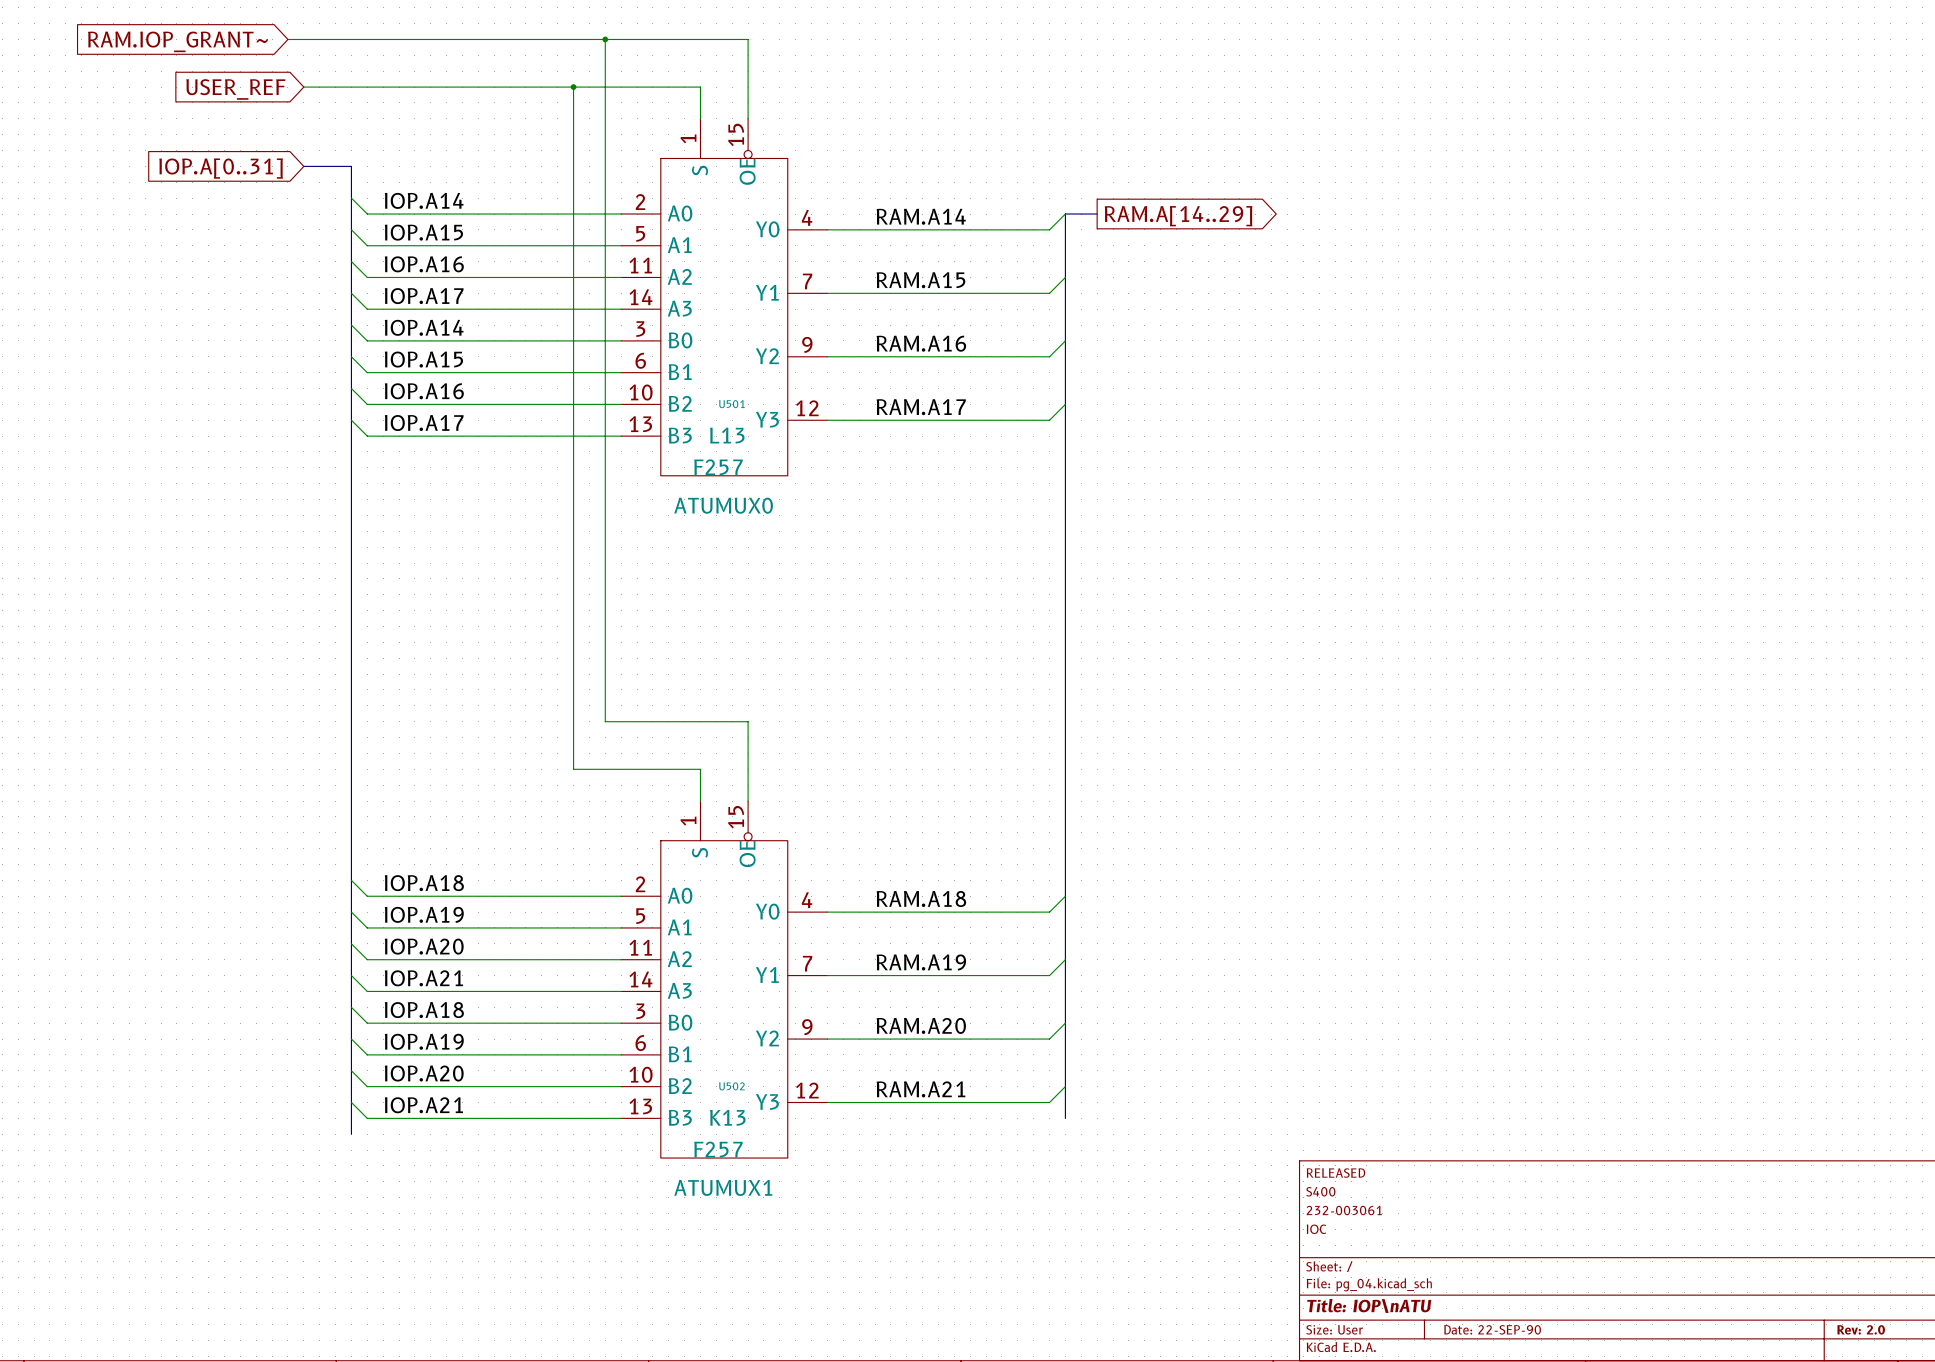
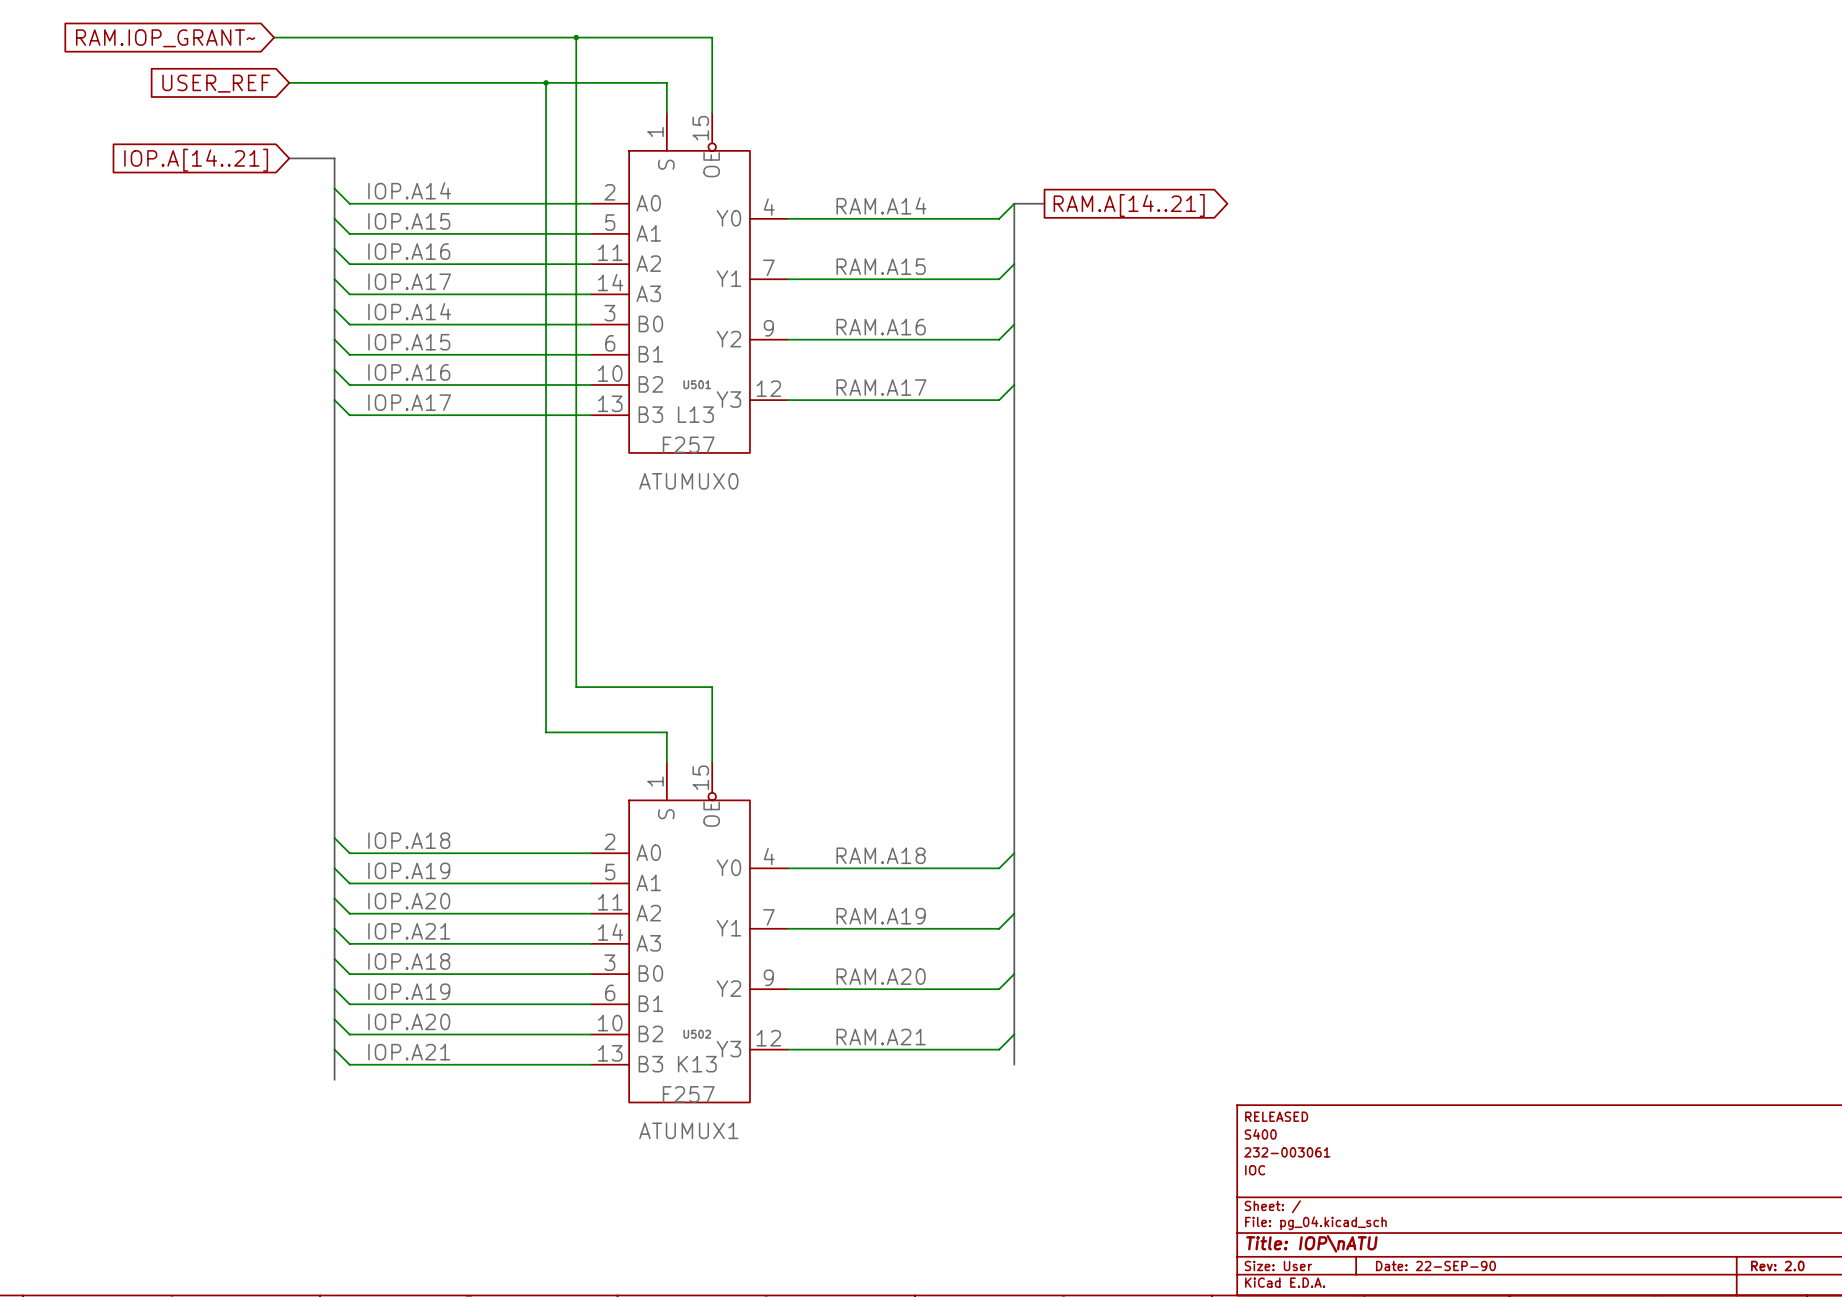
global label: IOP.A[0..31] (221, 168) -> IOP.A[14..21] (196, 160)
global label: RAM.A[14..29] (1178, 216) -> RAM.A[14..21] (1129, 205)

